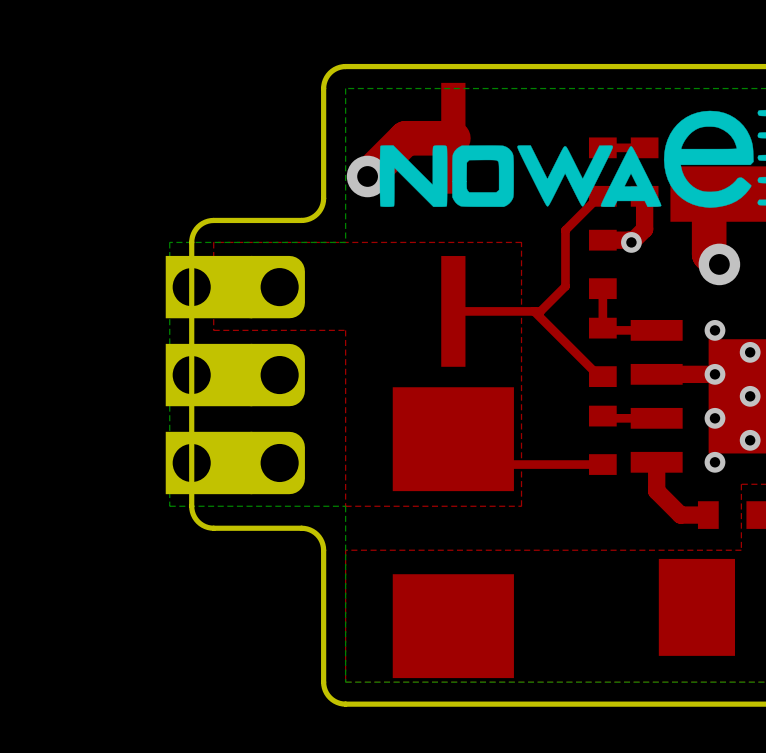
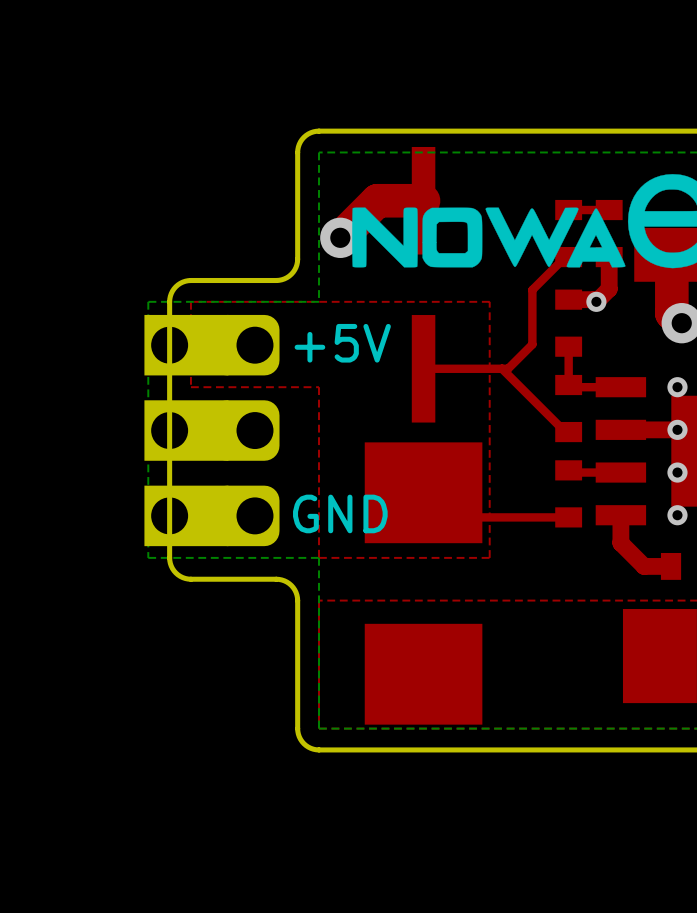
text: none -> +5V (342, 343)
text: none -> GND (340, 513)

